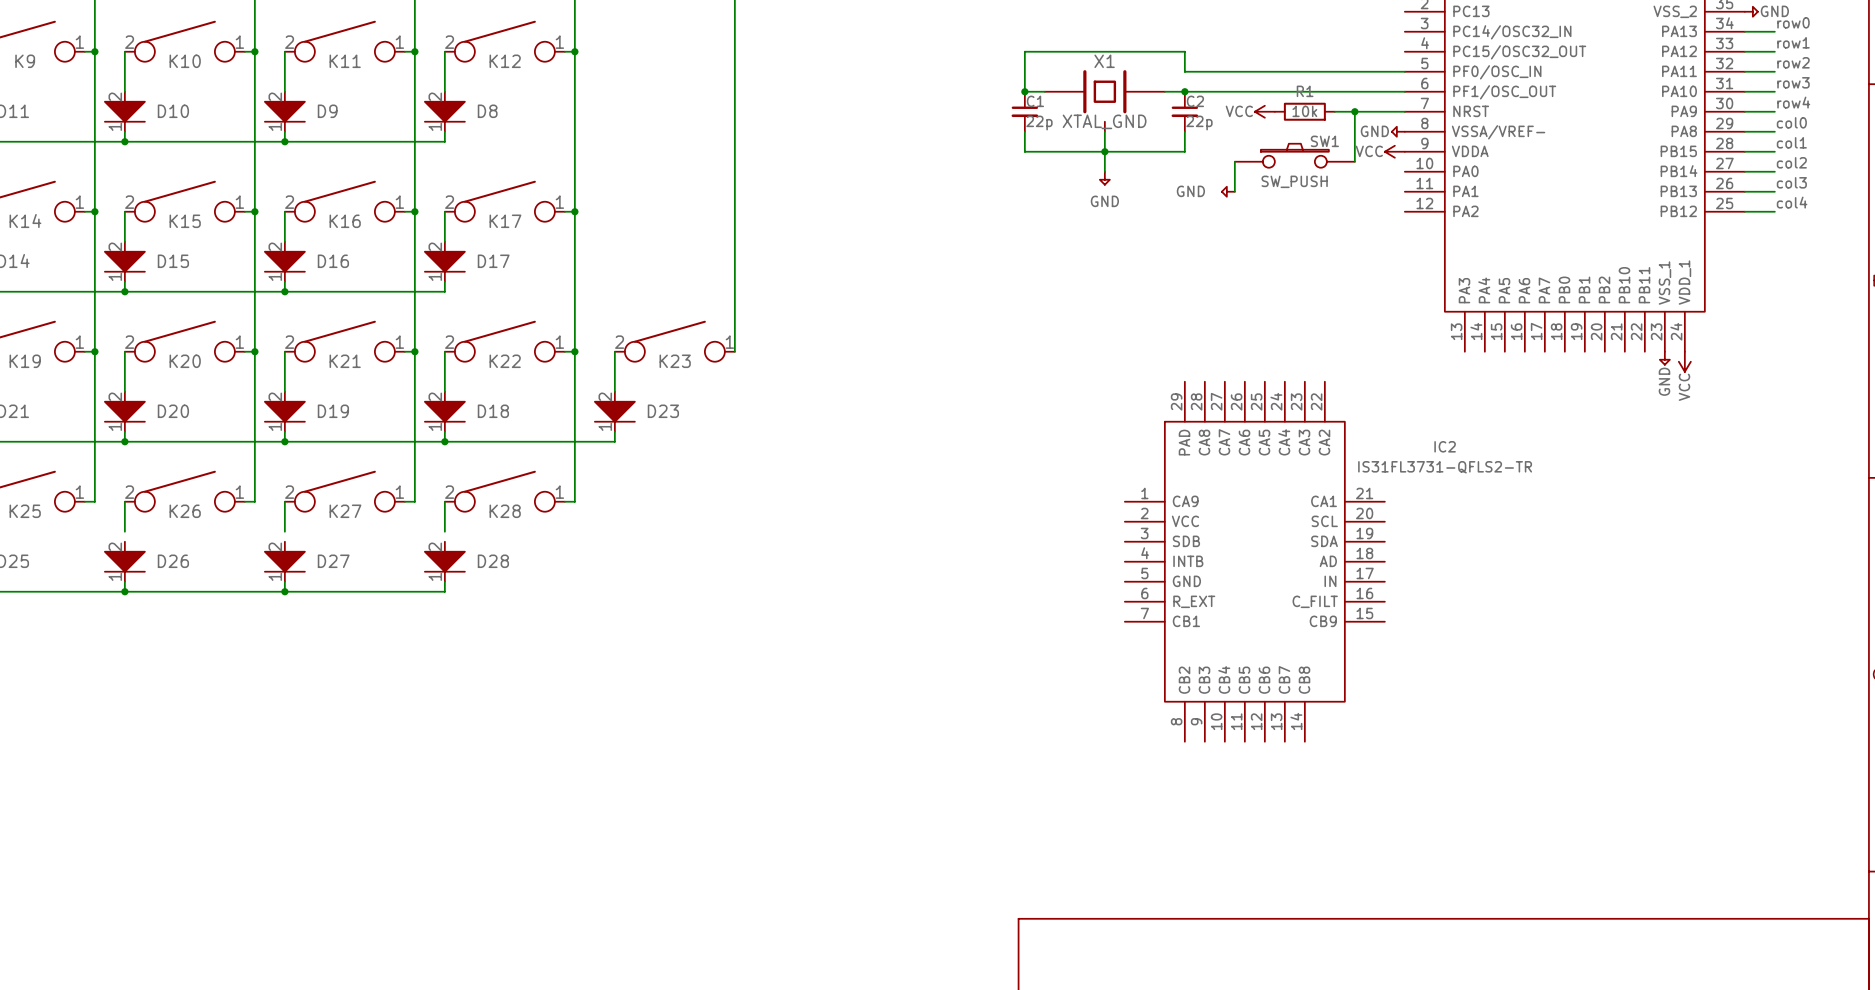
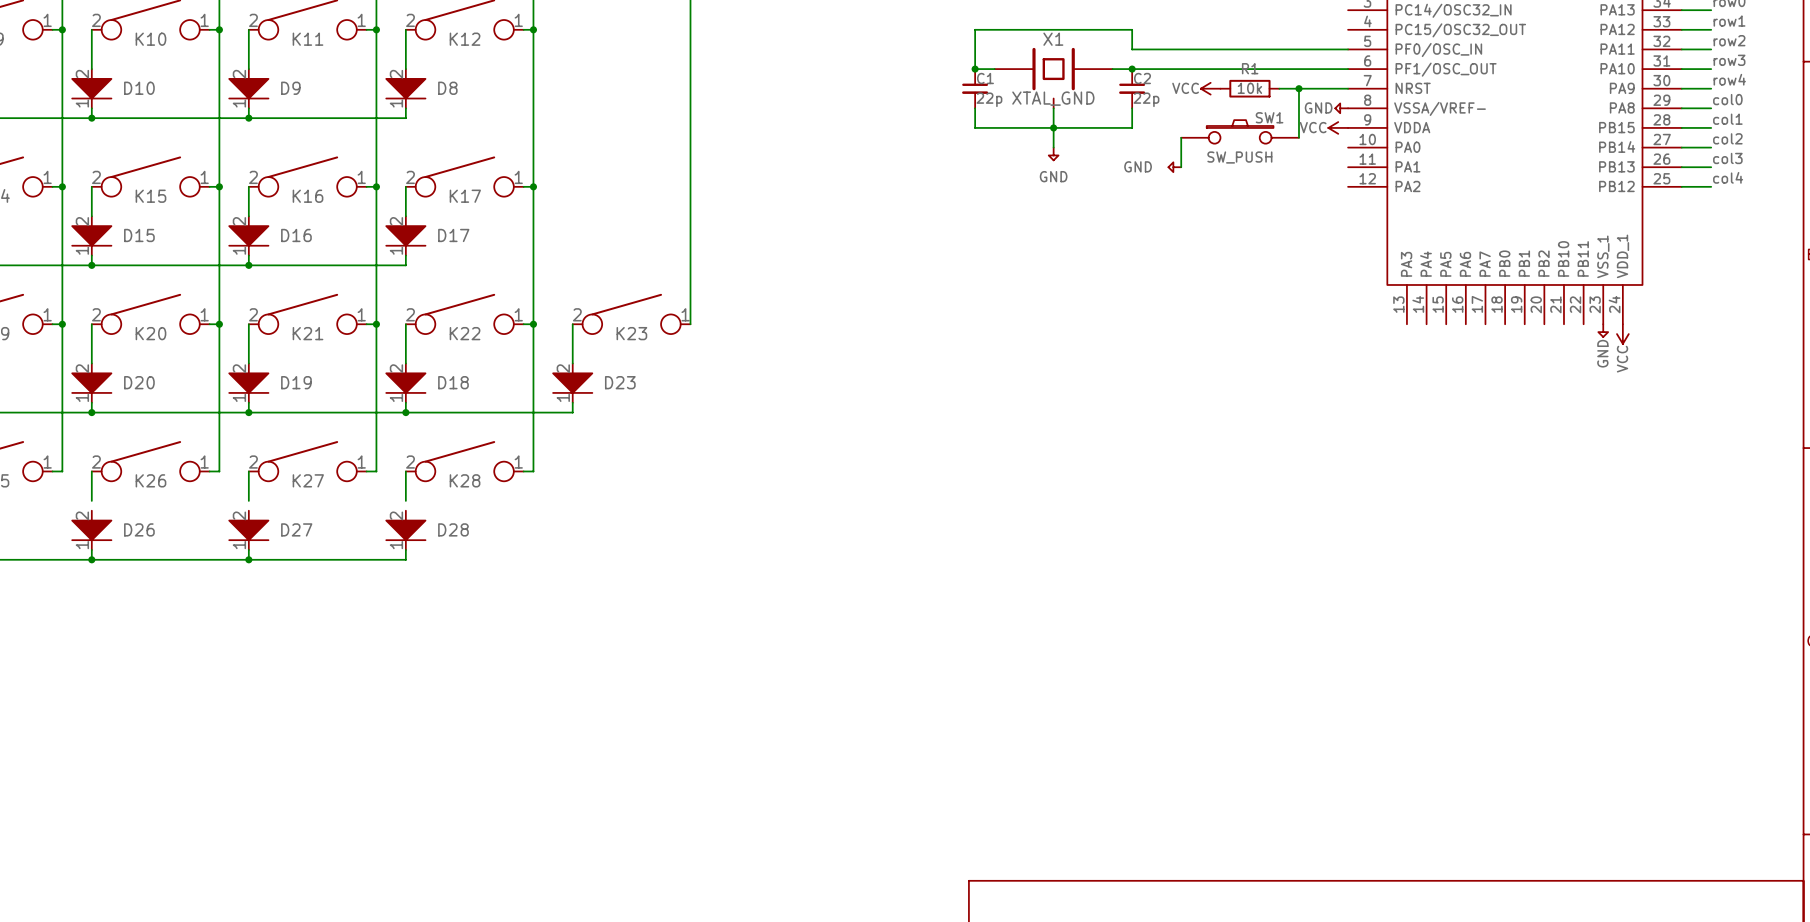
IC2: IS31FL3731-QFLS2-TR (1254, 561) -> none

